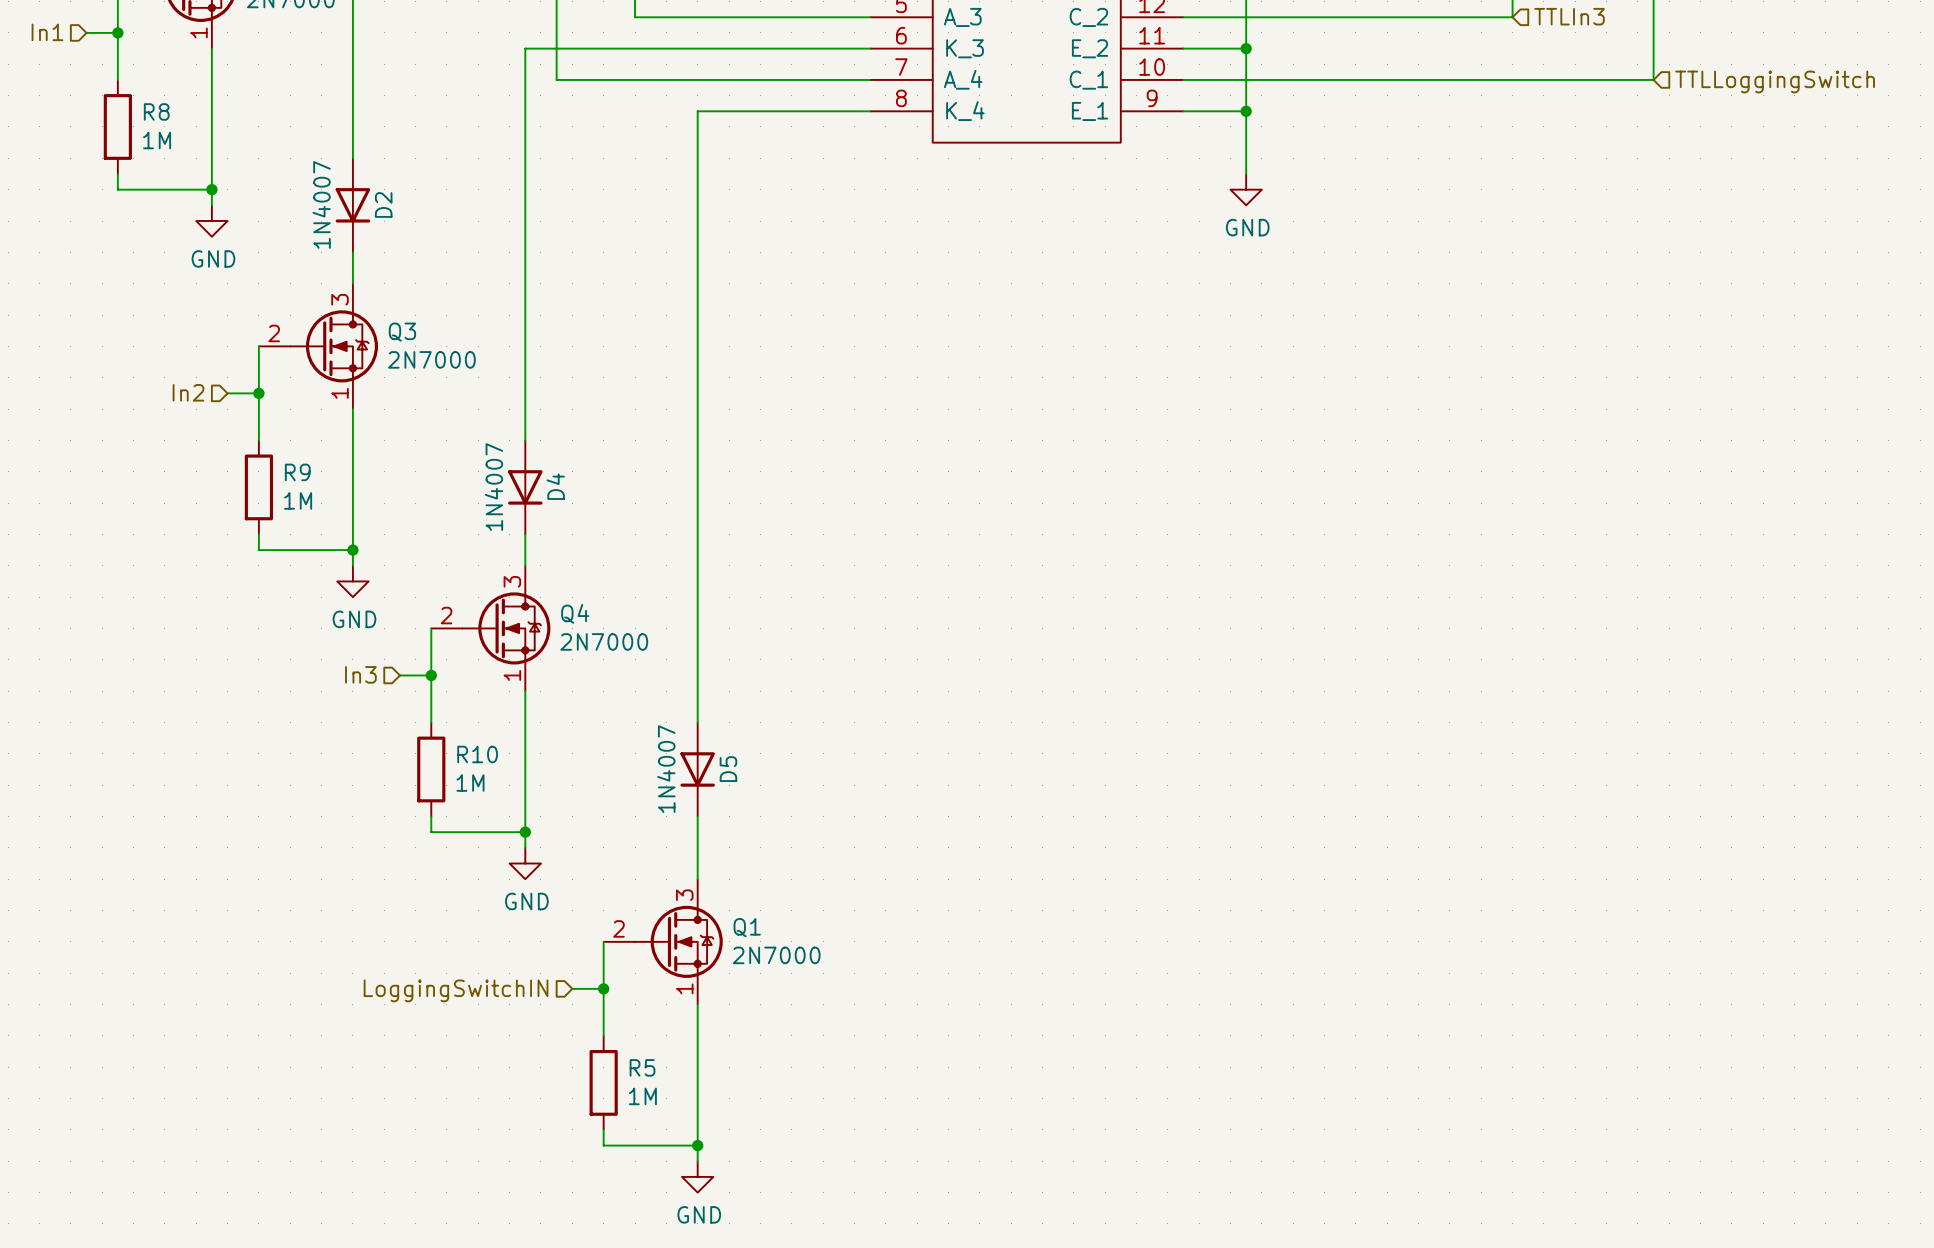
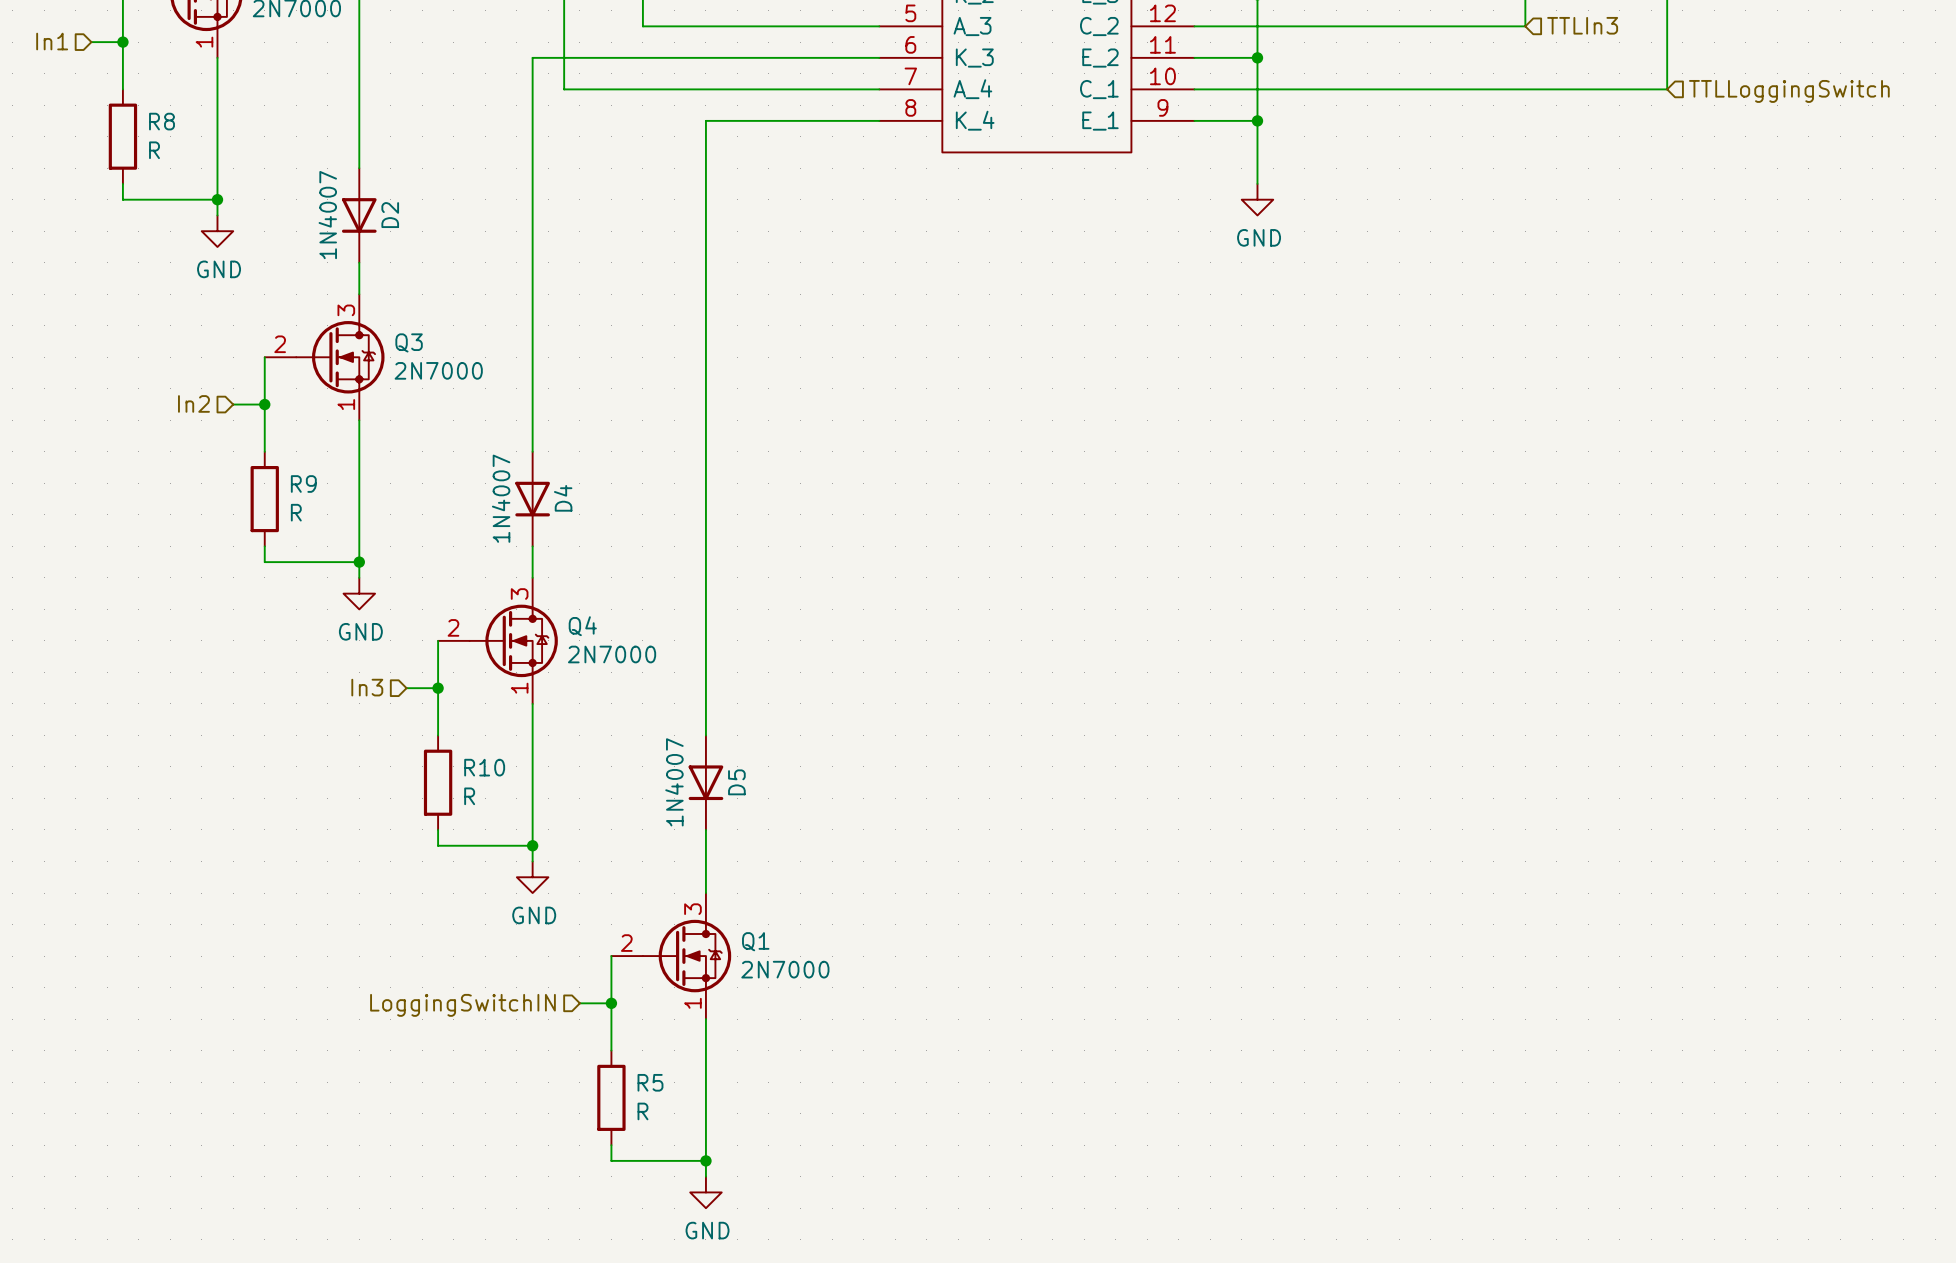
R8 value: 1M (157, 140) -> R (154, 150)
R9 value: 1M (298, 500) -> R (296, 512)
R10 value: 1M (470, 783) -> R (469, 796)
R5 value: 1M (642, 1096) -> R (642, 1111)

